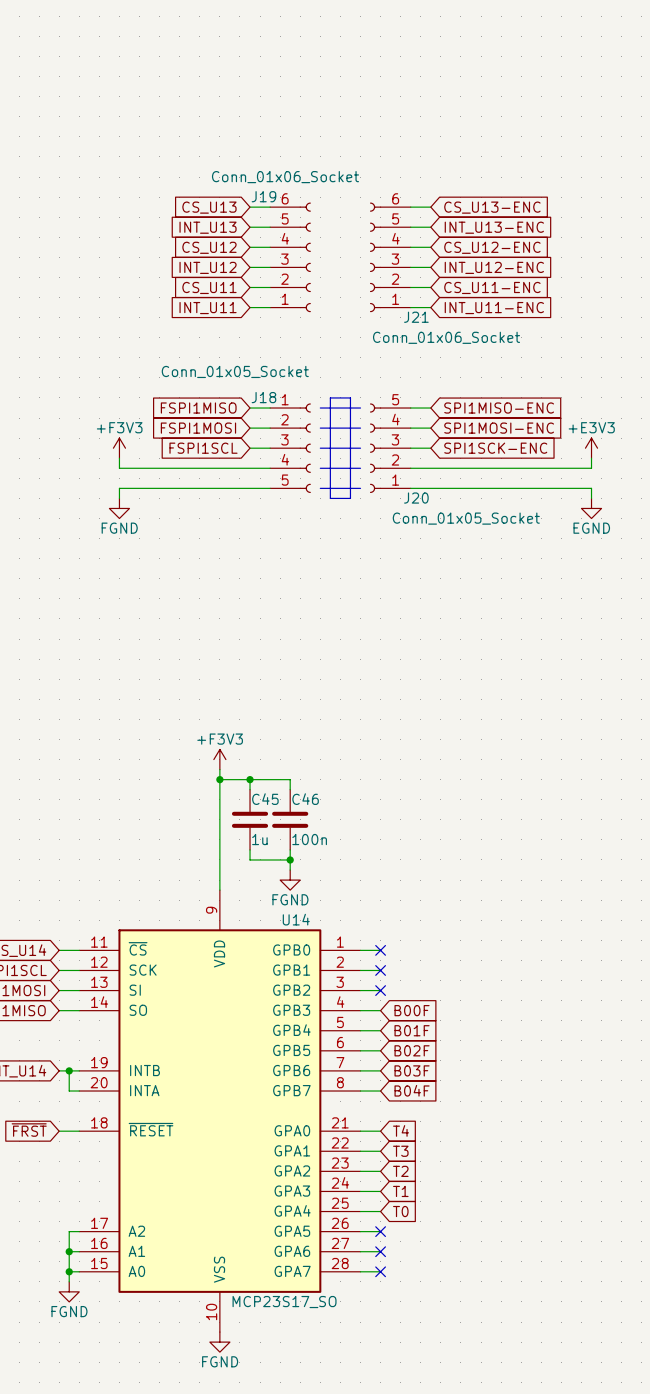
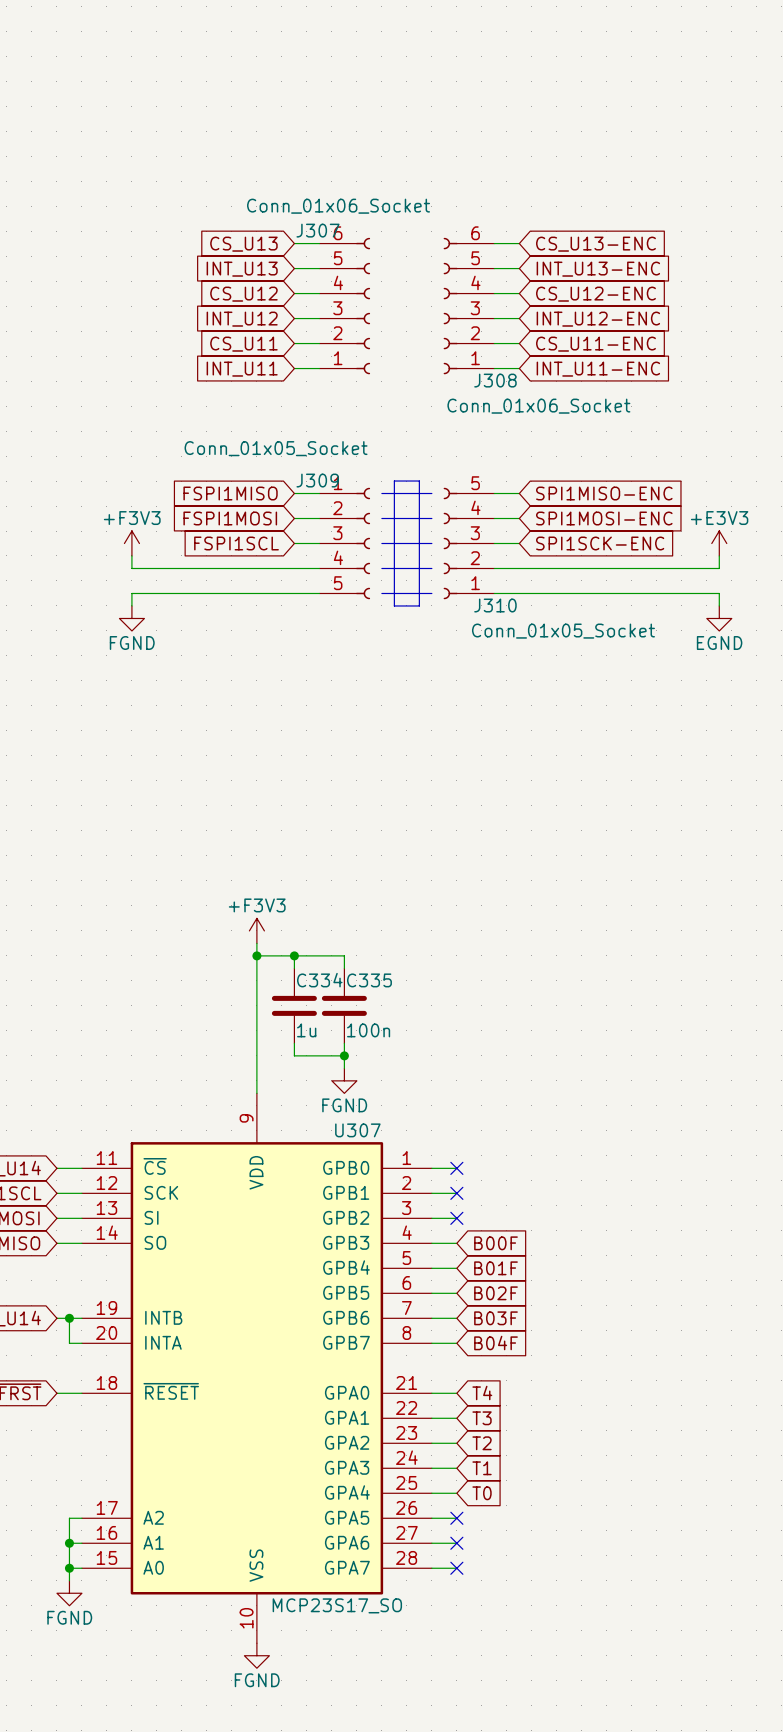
J19 name: J19 (263, 196) -> J307 (318, 230)
J21 name: J21 (416, 317) -> J308 (495, 380)
J18 name: J18 (263, 397) -> J309 (317, 480)
J20 name: J20 (416, 498) -> J310 (495, 605)
C45 name: C45 (265, 799) -> C334 (319, 980)
C46 name: C46 (305, 799) -> C335 (369, 980)
U14 name: U14 (296, 919) -> U307 (357, 1130)

